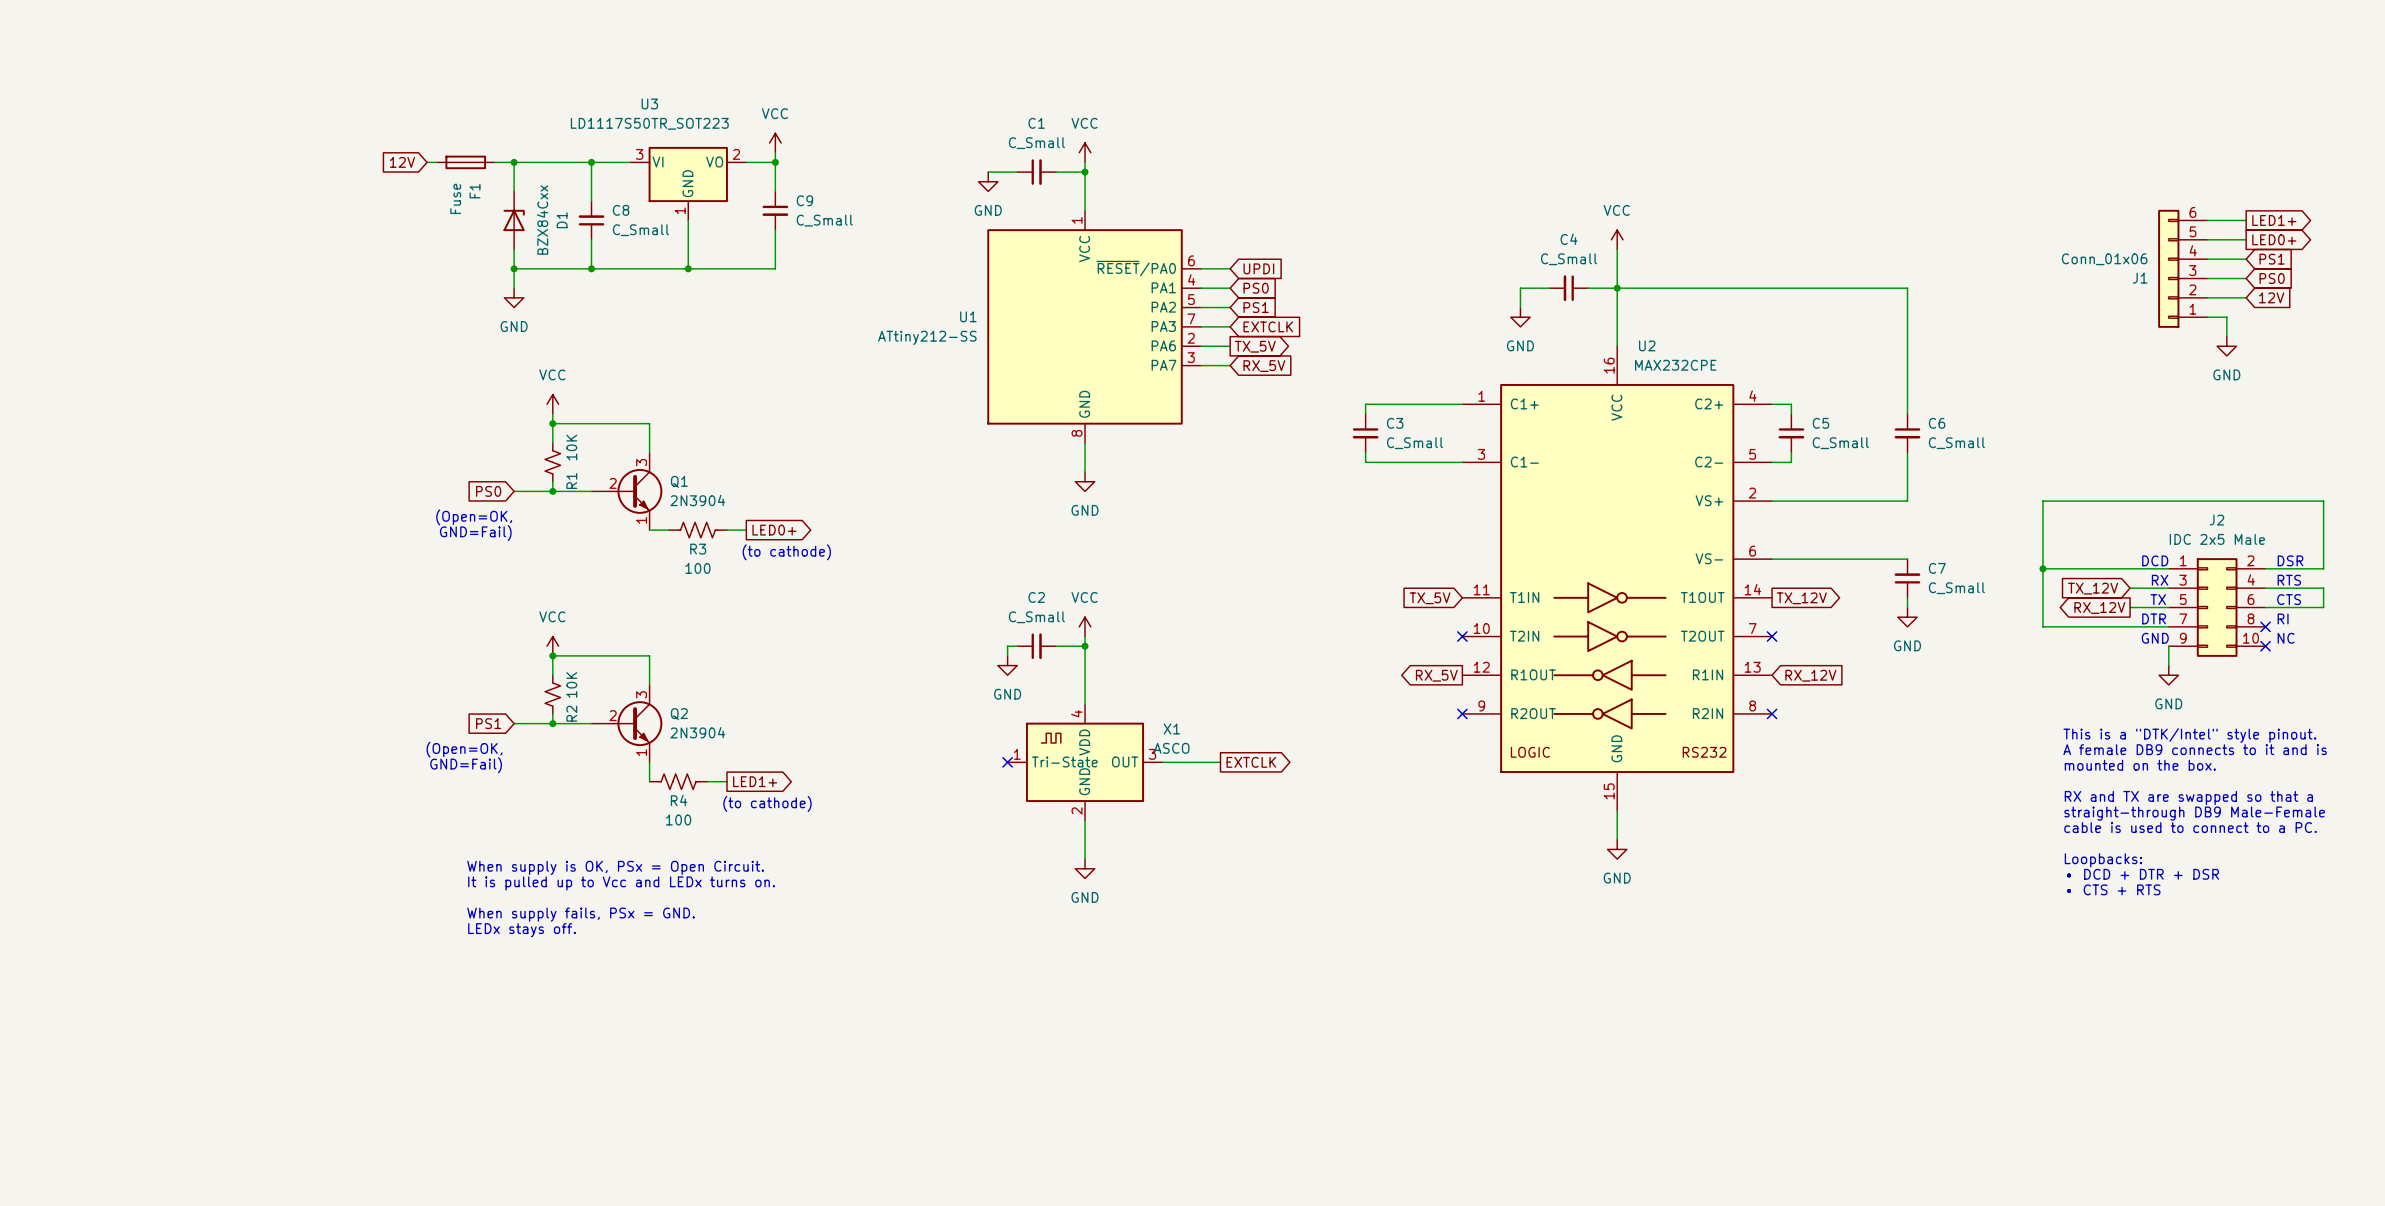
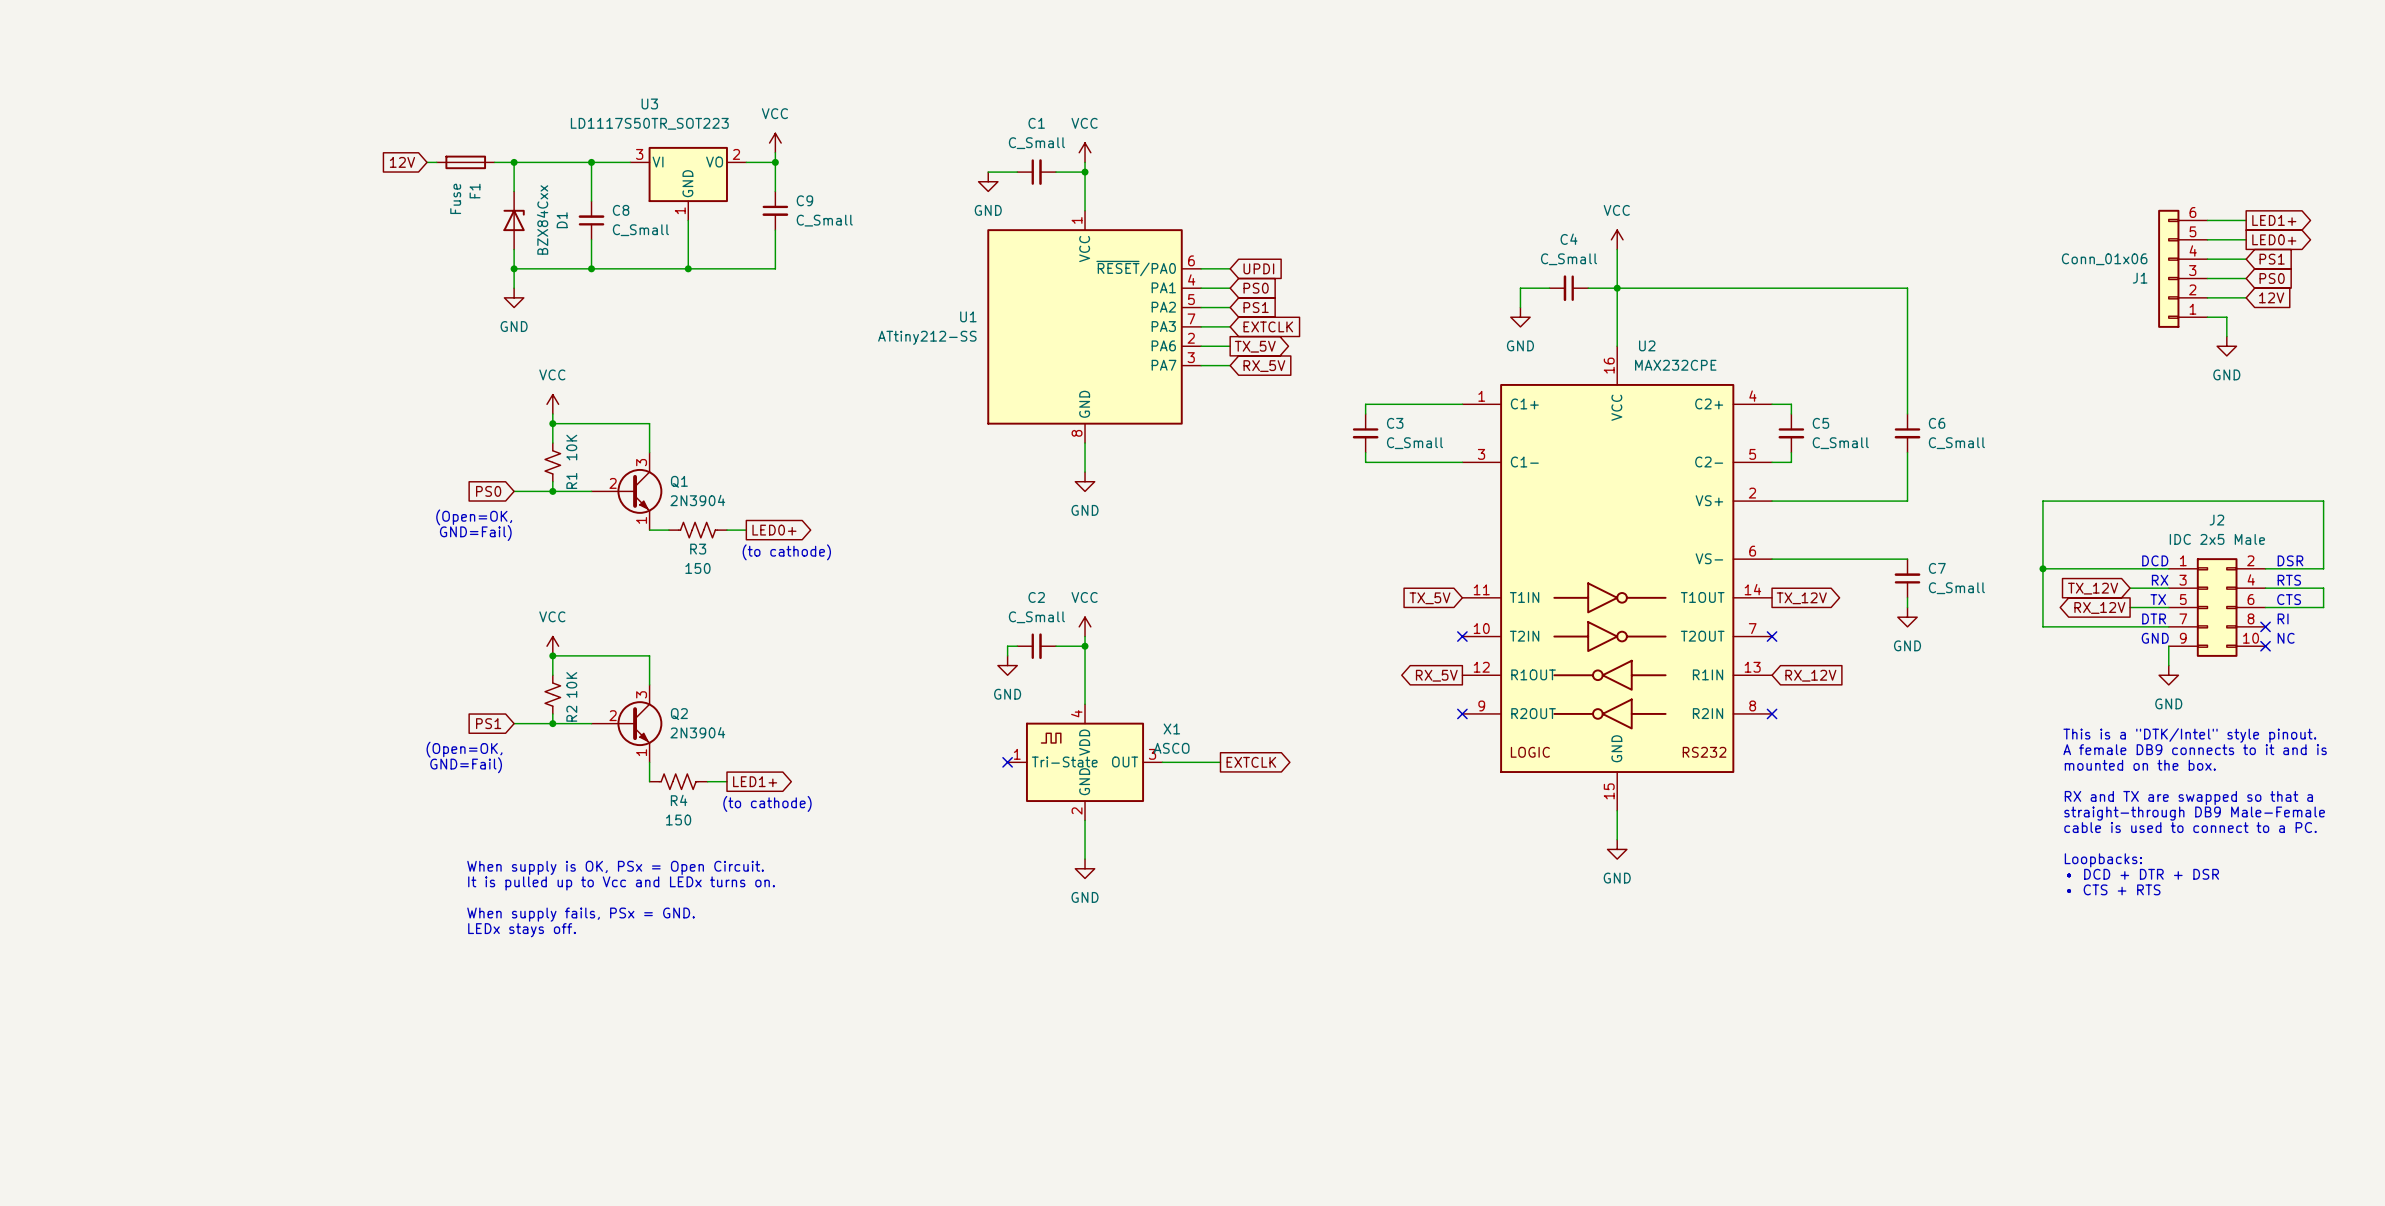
R3 value: 100 (697, 568) -> 150 (697, 568)
R4 value: 100 (678, 820) -> 150 (678, 820)

